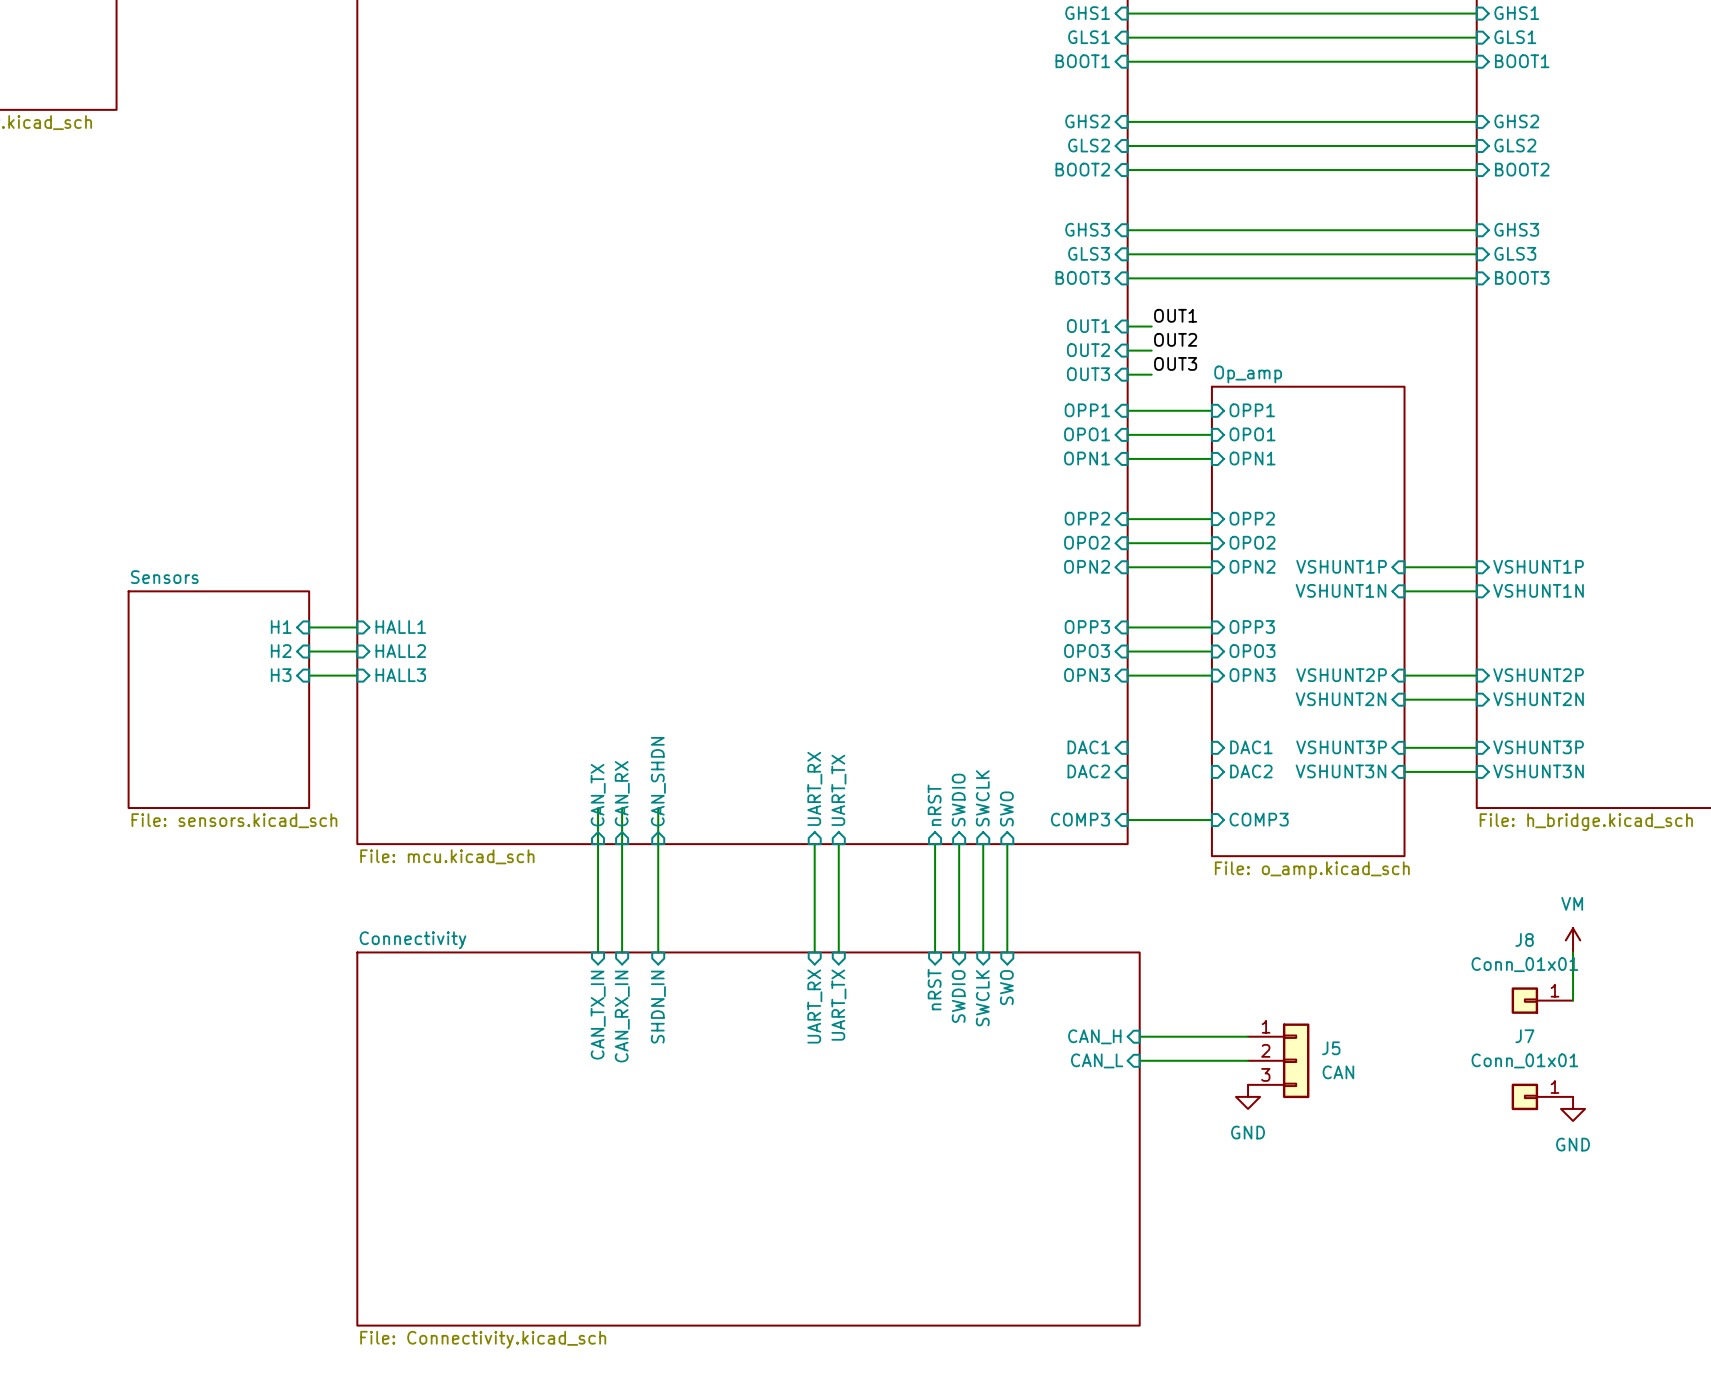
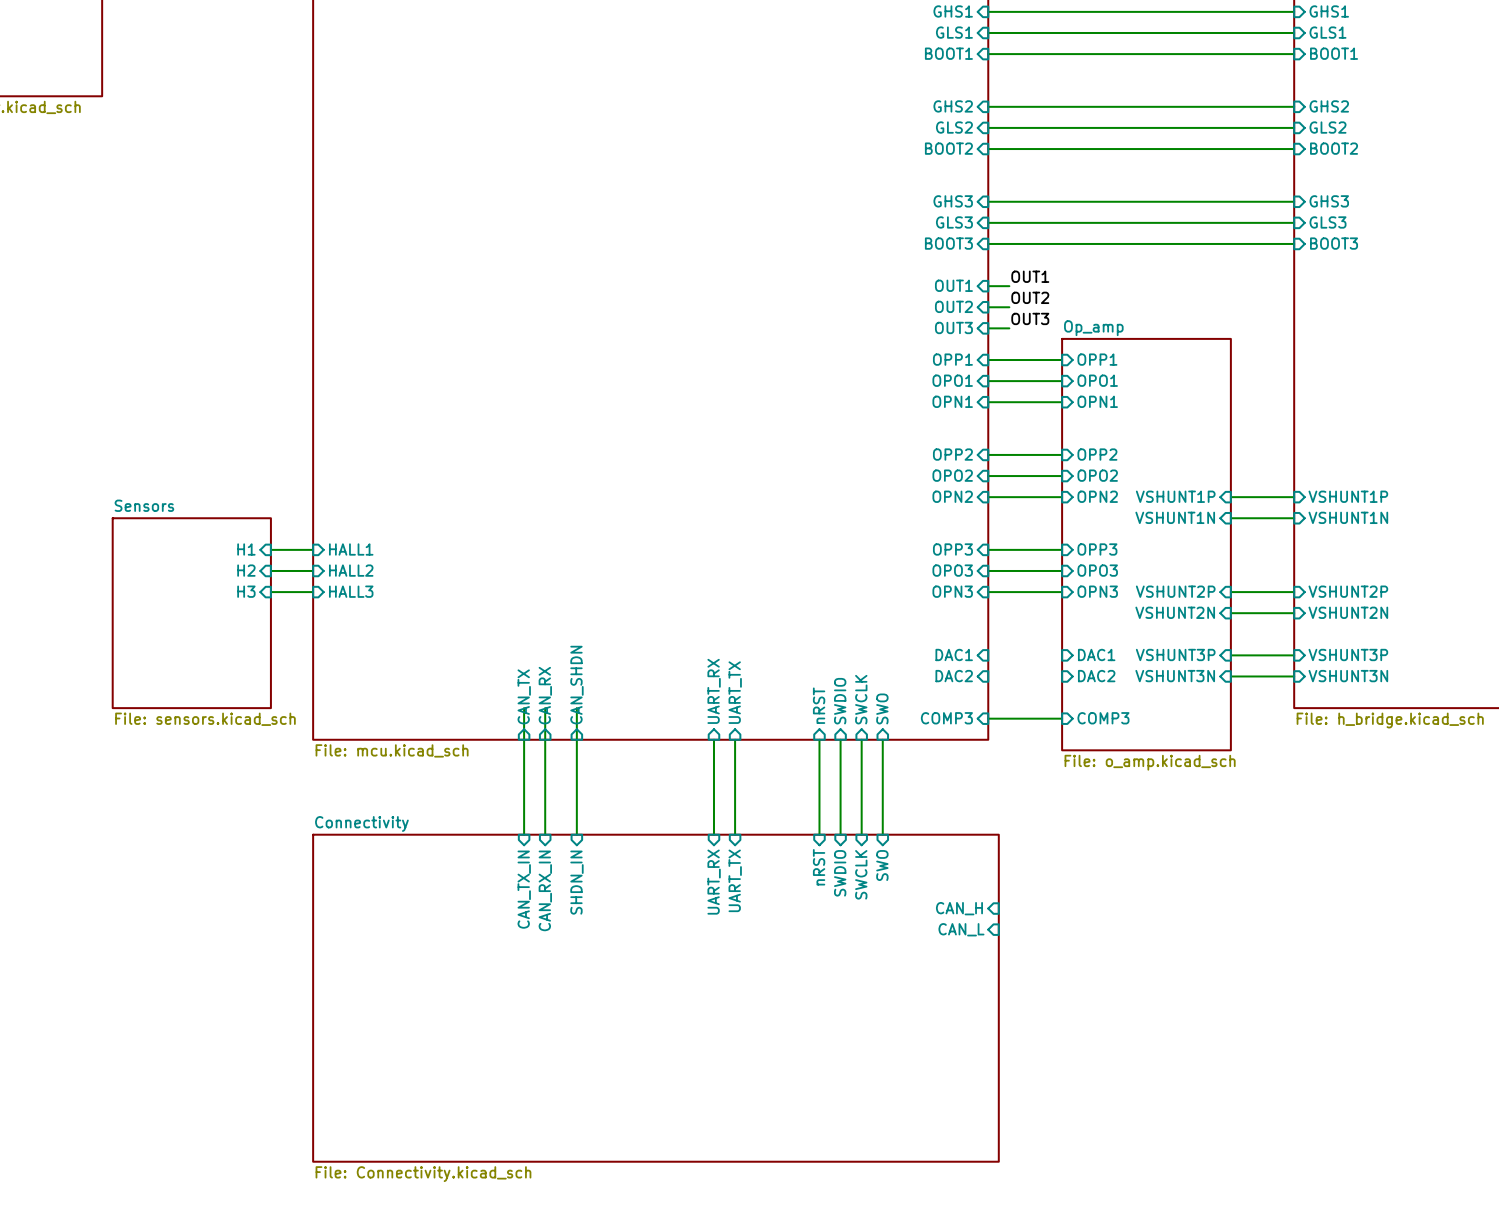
power symbol: VM (1573, 940) -> none
wire: (1573, 952) (1573, 1000) -> none
J8: Conn_01x01 (1542, 1000) -> none
wire: (1139, 1036) (1248, 1036) -> none
wire: (1139, 1060) (1248, 1060) -> none
J5: CAN (1278, 1060) -> none
power symbol: GND (1248, 1096) -> none
J7: Conn_01x01 (1542, 1096) -> none
power symbol: GND (1573, 1108) -> none

